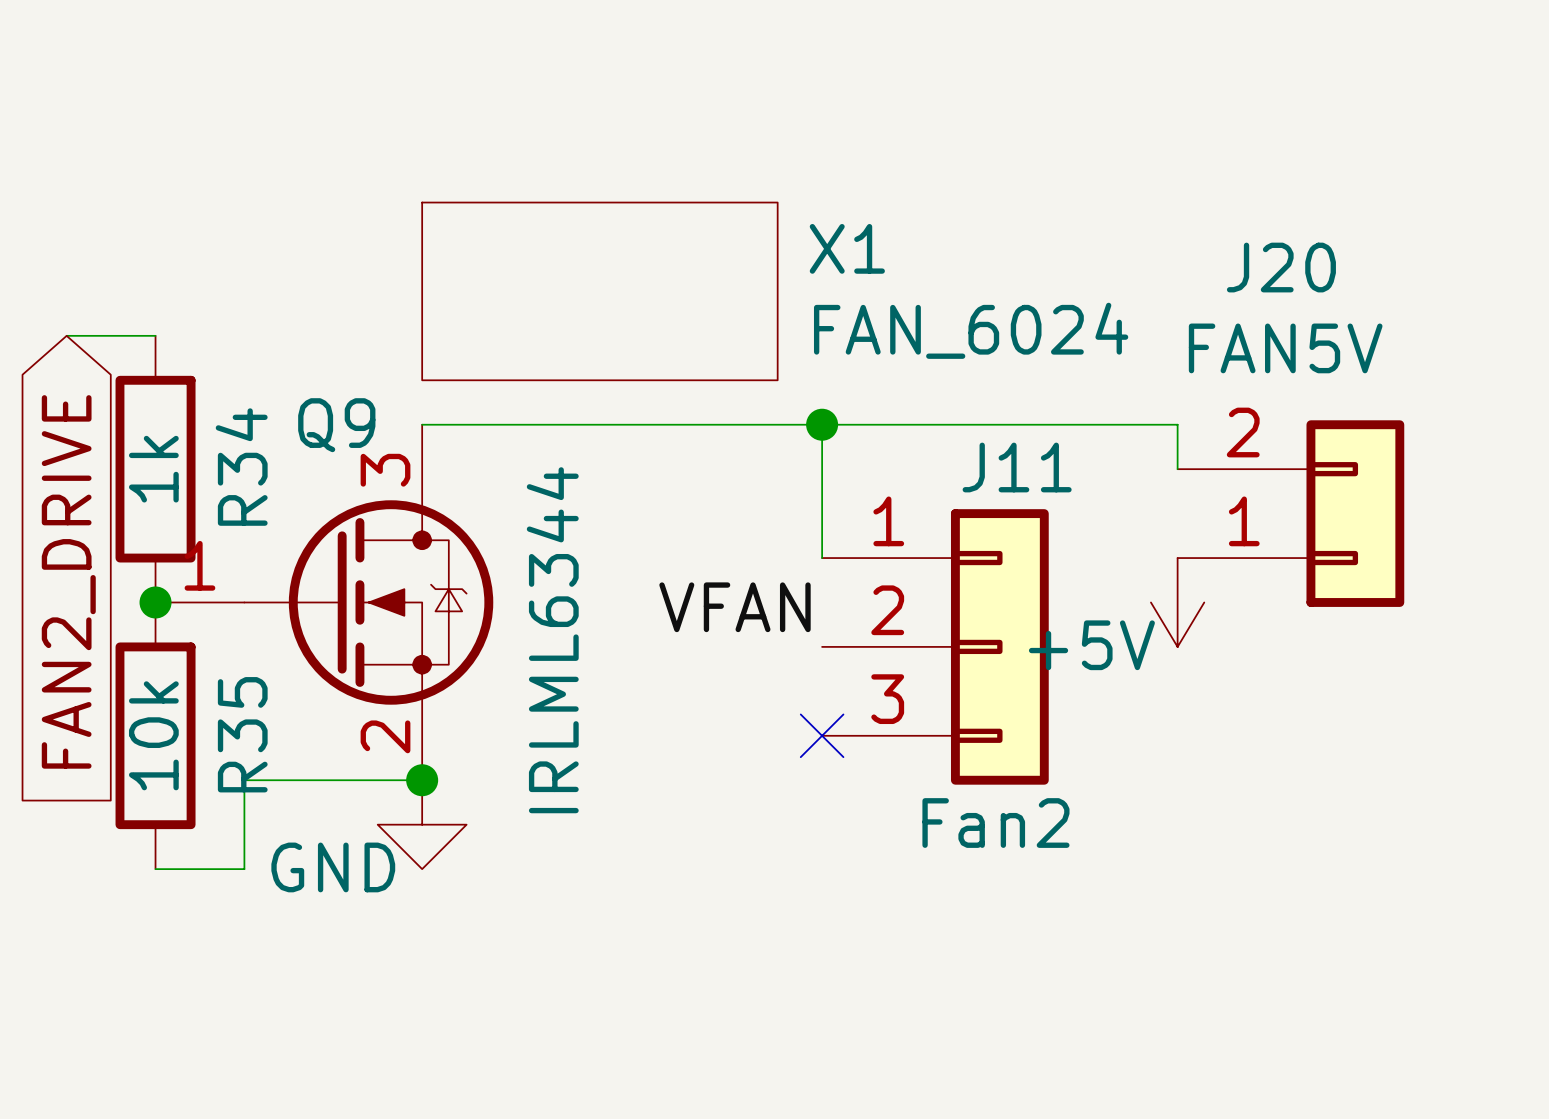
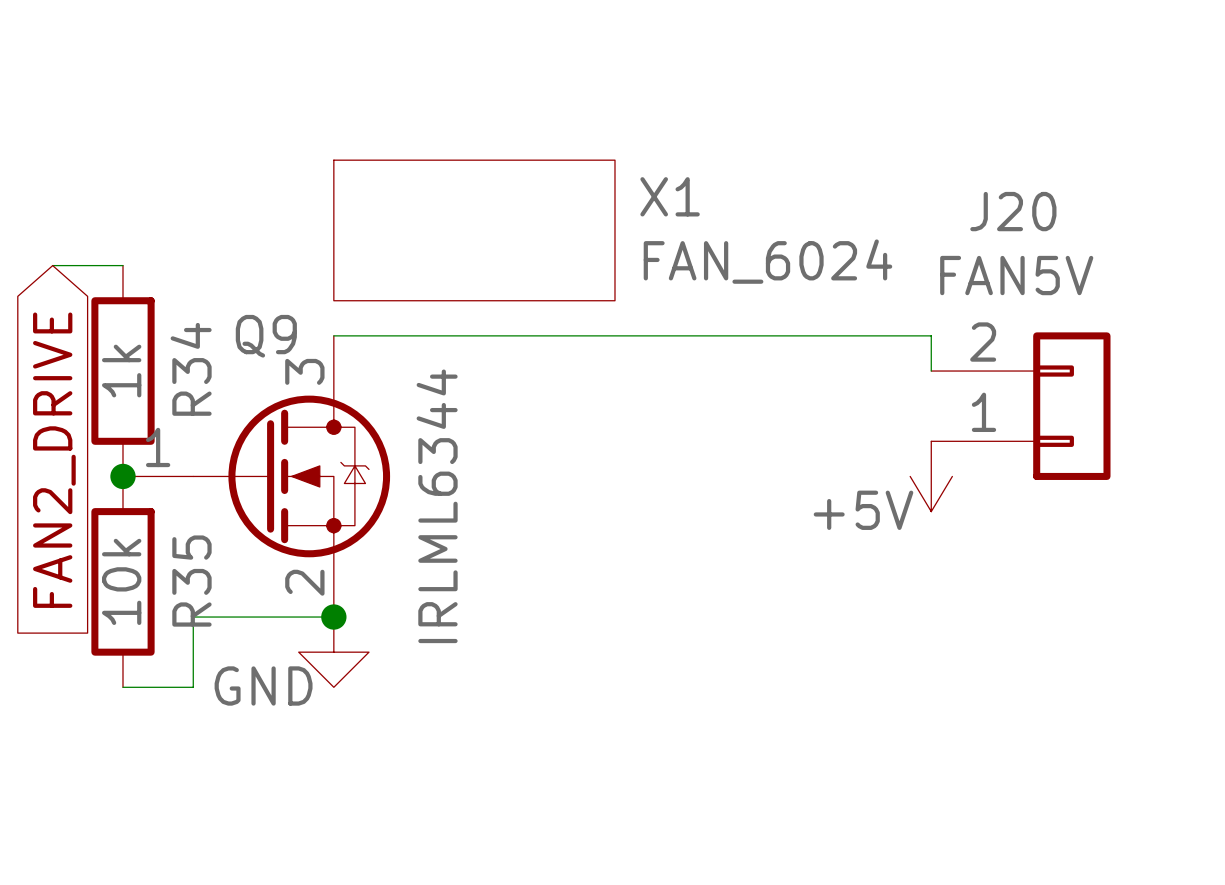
wire: (822, 424) (822, 558) -> none
junction: (822, 424) -> none
label: VFAN (735, 607) -> none
J11: Fan2 (935, 646) -> none
no-connect mark: (822, 735) -> none

